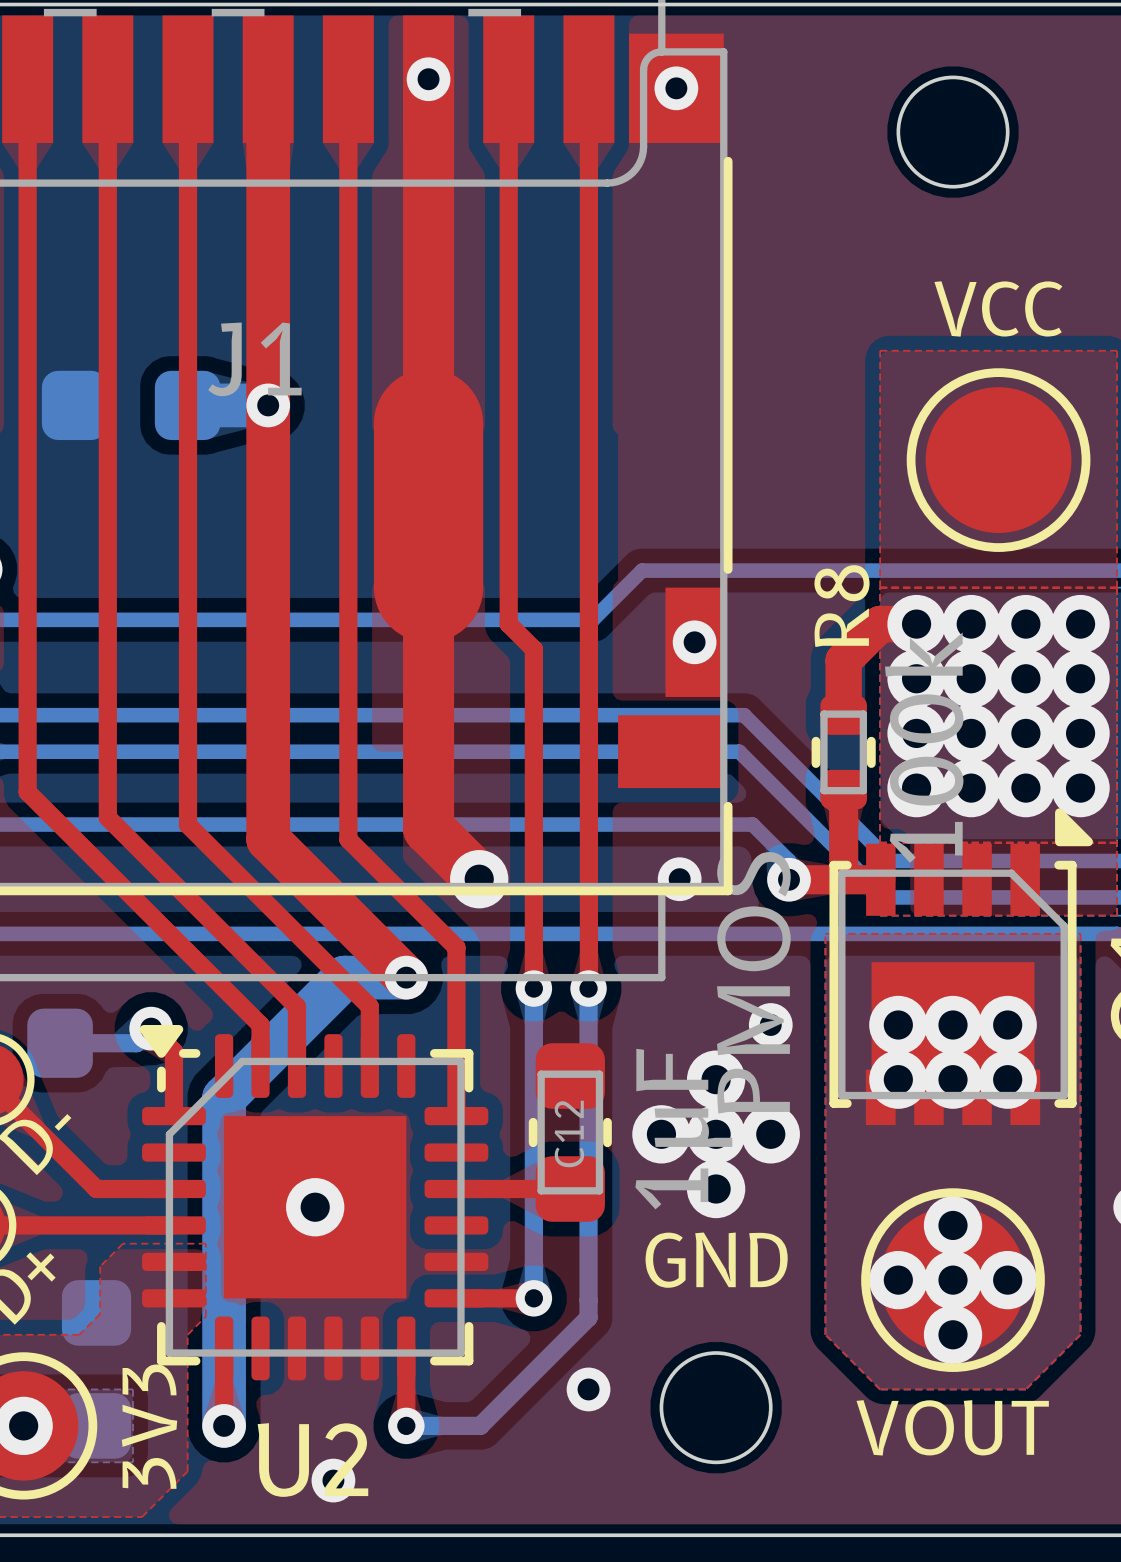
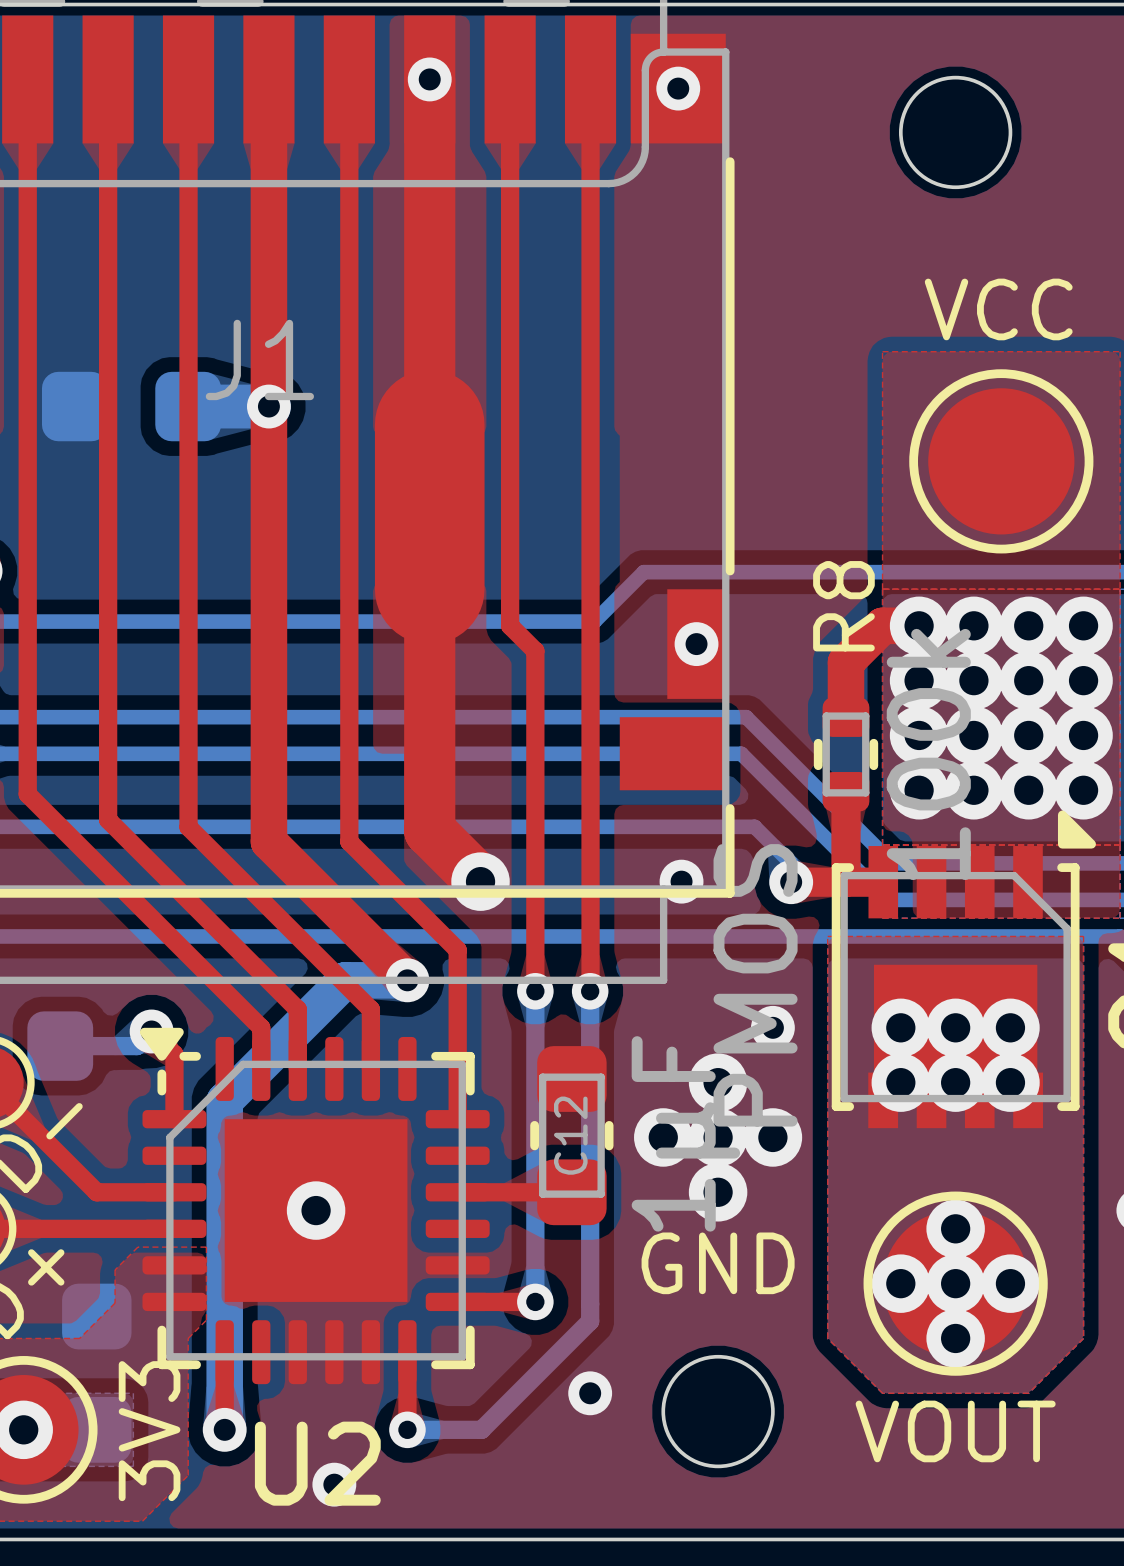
top track width: thick (268, 79) (268, 839) (406, 977) -> thin (268, 79) (268, 841) (407, 980)
bottom track width: thick (406, 977) (344, 977) (224, 1097) (224, 1425) -> thin (407, 980) (345, 980) (224, 1100) (224, 1429)
top zone outline: (137, 1243) (122, 1243) (100, 1266) (100, 1314) -> (137, 1247) (115, 1269) (115, 1303) (100, 1317)

